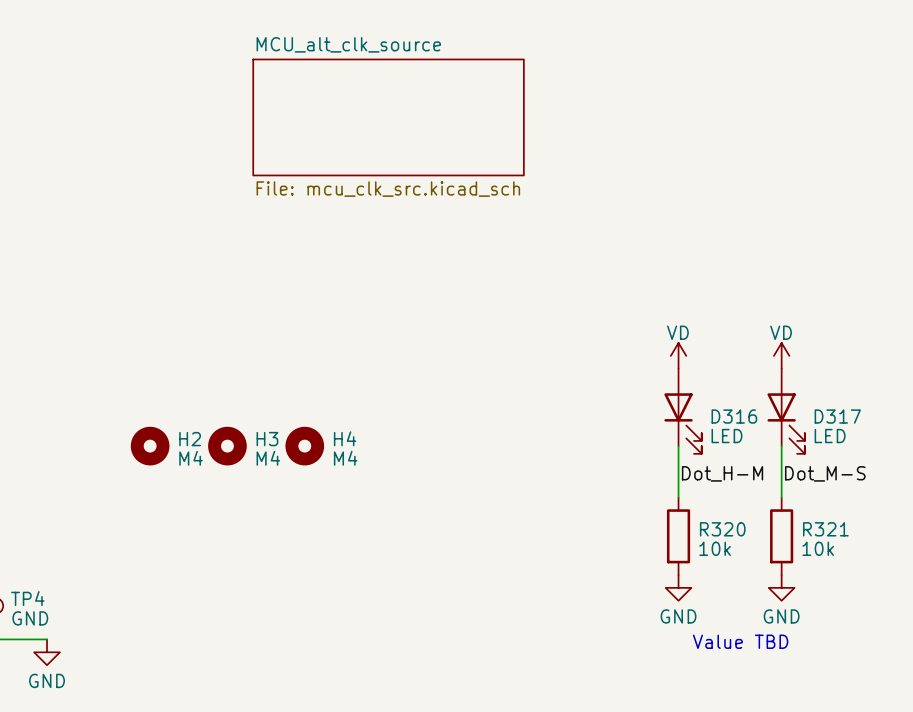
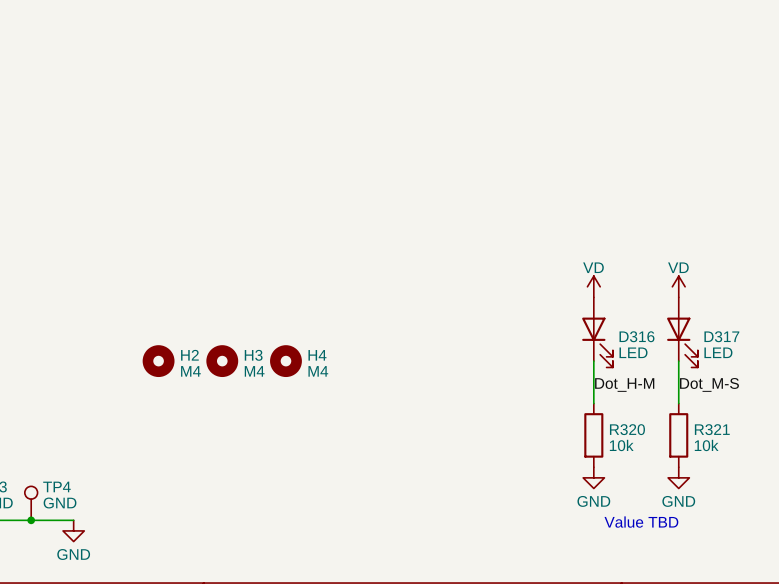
sheet MCU_alt_clk_source: File: mcu_clk_src.kicad_sch (388, 117) -> none

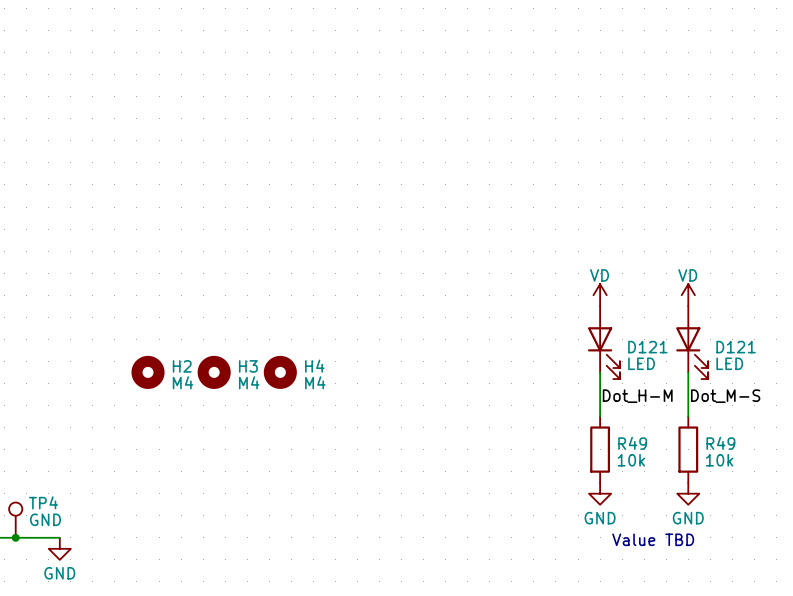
D316 name: D316 (636, 336) -> D121 (647, 347)
D317 name: D317 (721, 336) -> D121 (736, 347)
R320 name: R320 (627, 429) -> R49 (632, 443)
R321 name: R321 (712, 429) -> R49 (720, 443)

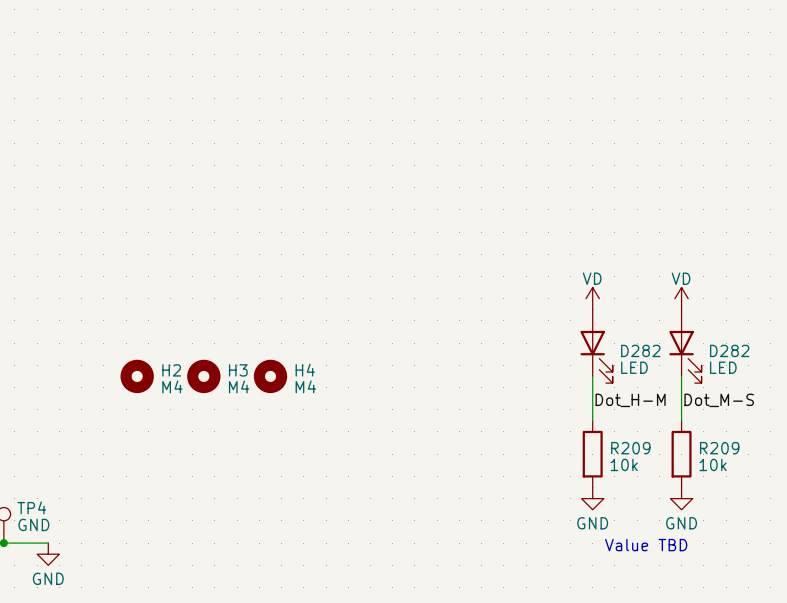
D121 name: D121 (647, 347) -> D282 (640, 350)
D121 name: D121 (736, 347) -> D282 (729, 350)
R49 name: R49 (632, 443) -> R209 (630, 448)
R49 name: R49 (720, 443) -> R209 (719, 448)

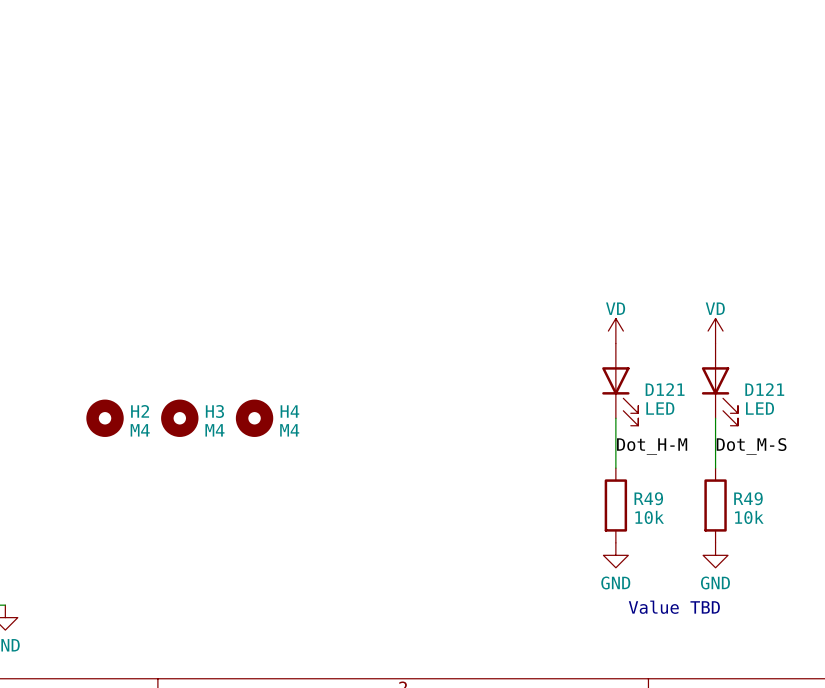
D282 name: D282 (640, 350) -> D121 (665, 389)
D282 name: D282 (729, 350) -> D121 (764, 389)
R209 name: R209 (630, 448) -> R49 (648, 498)
R209 name: R209 (719, 448) -> R49 (748, 498)

